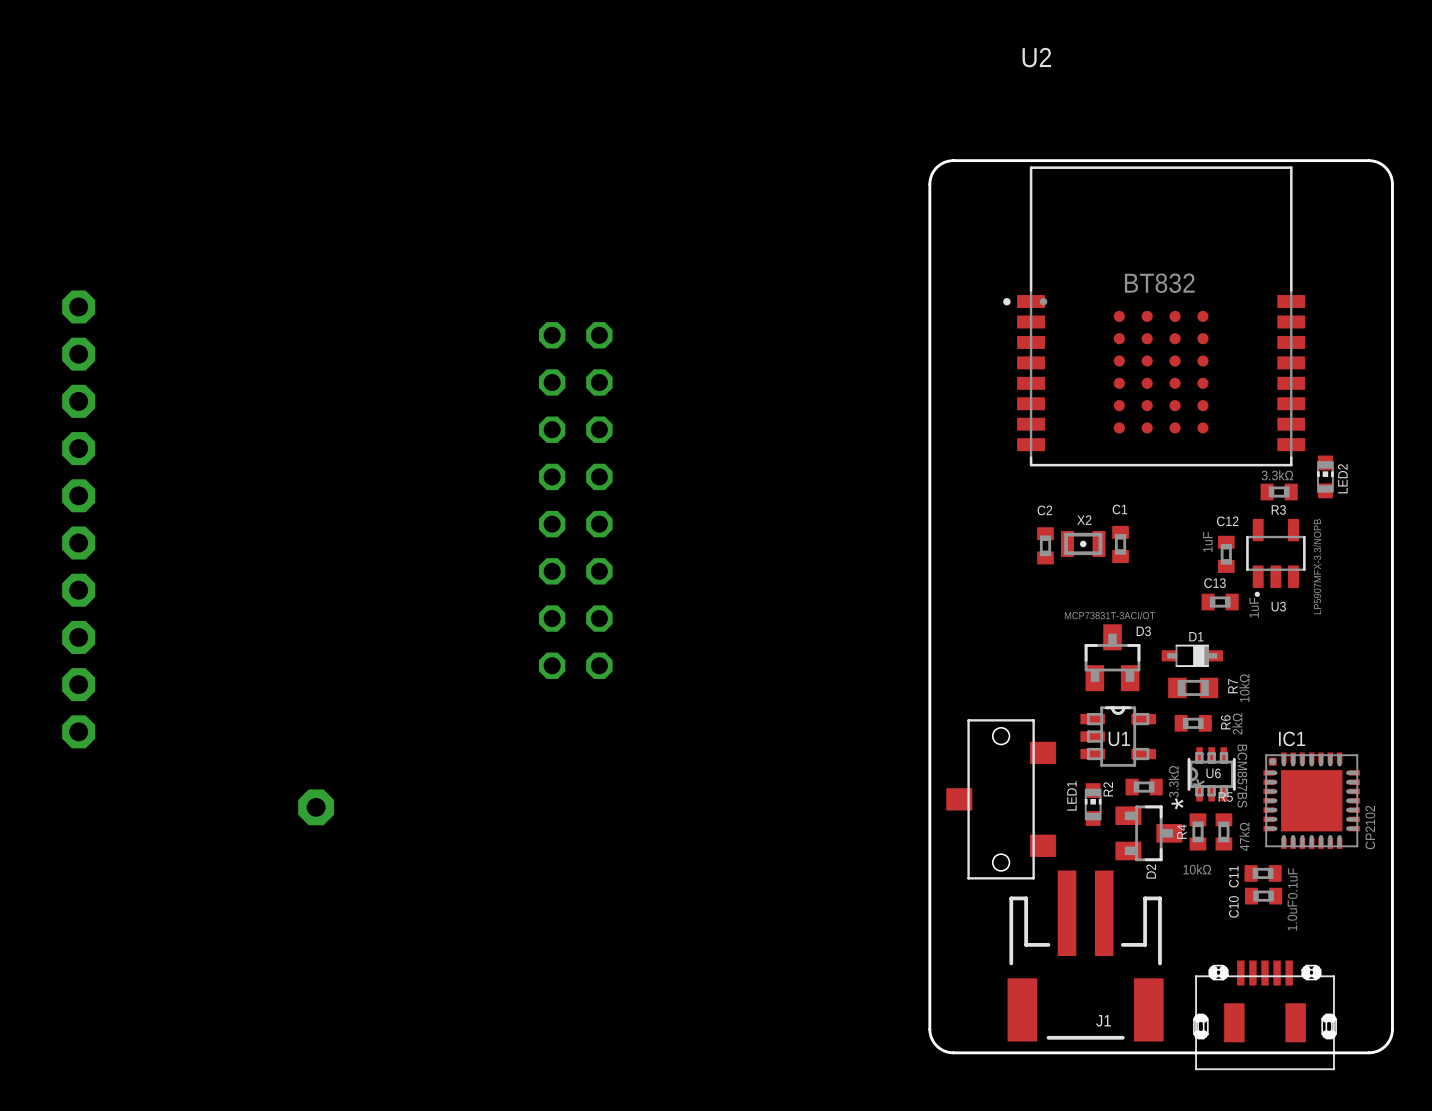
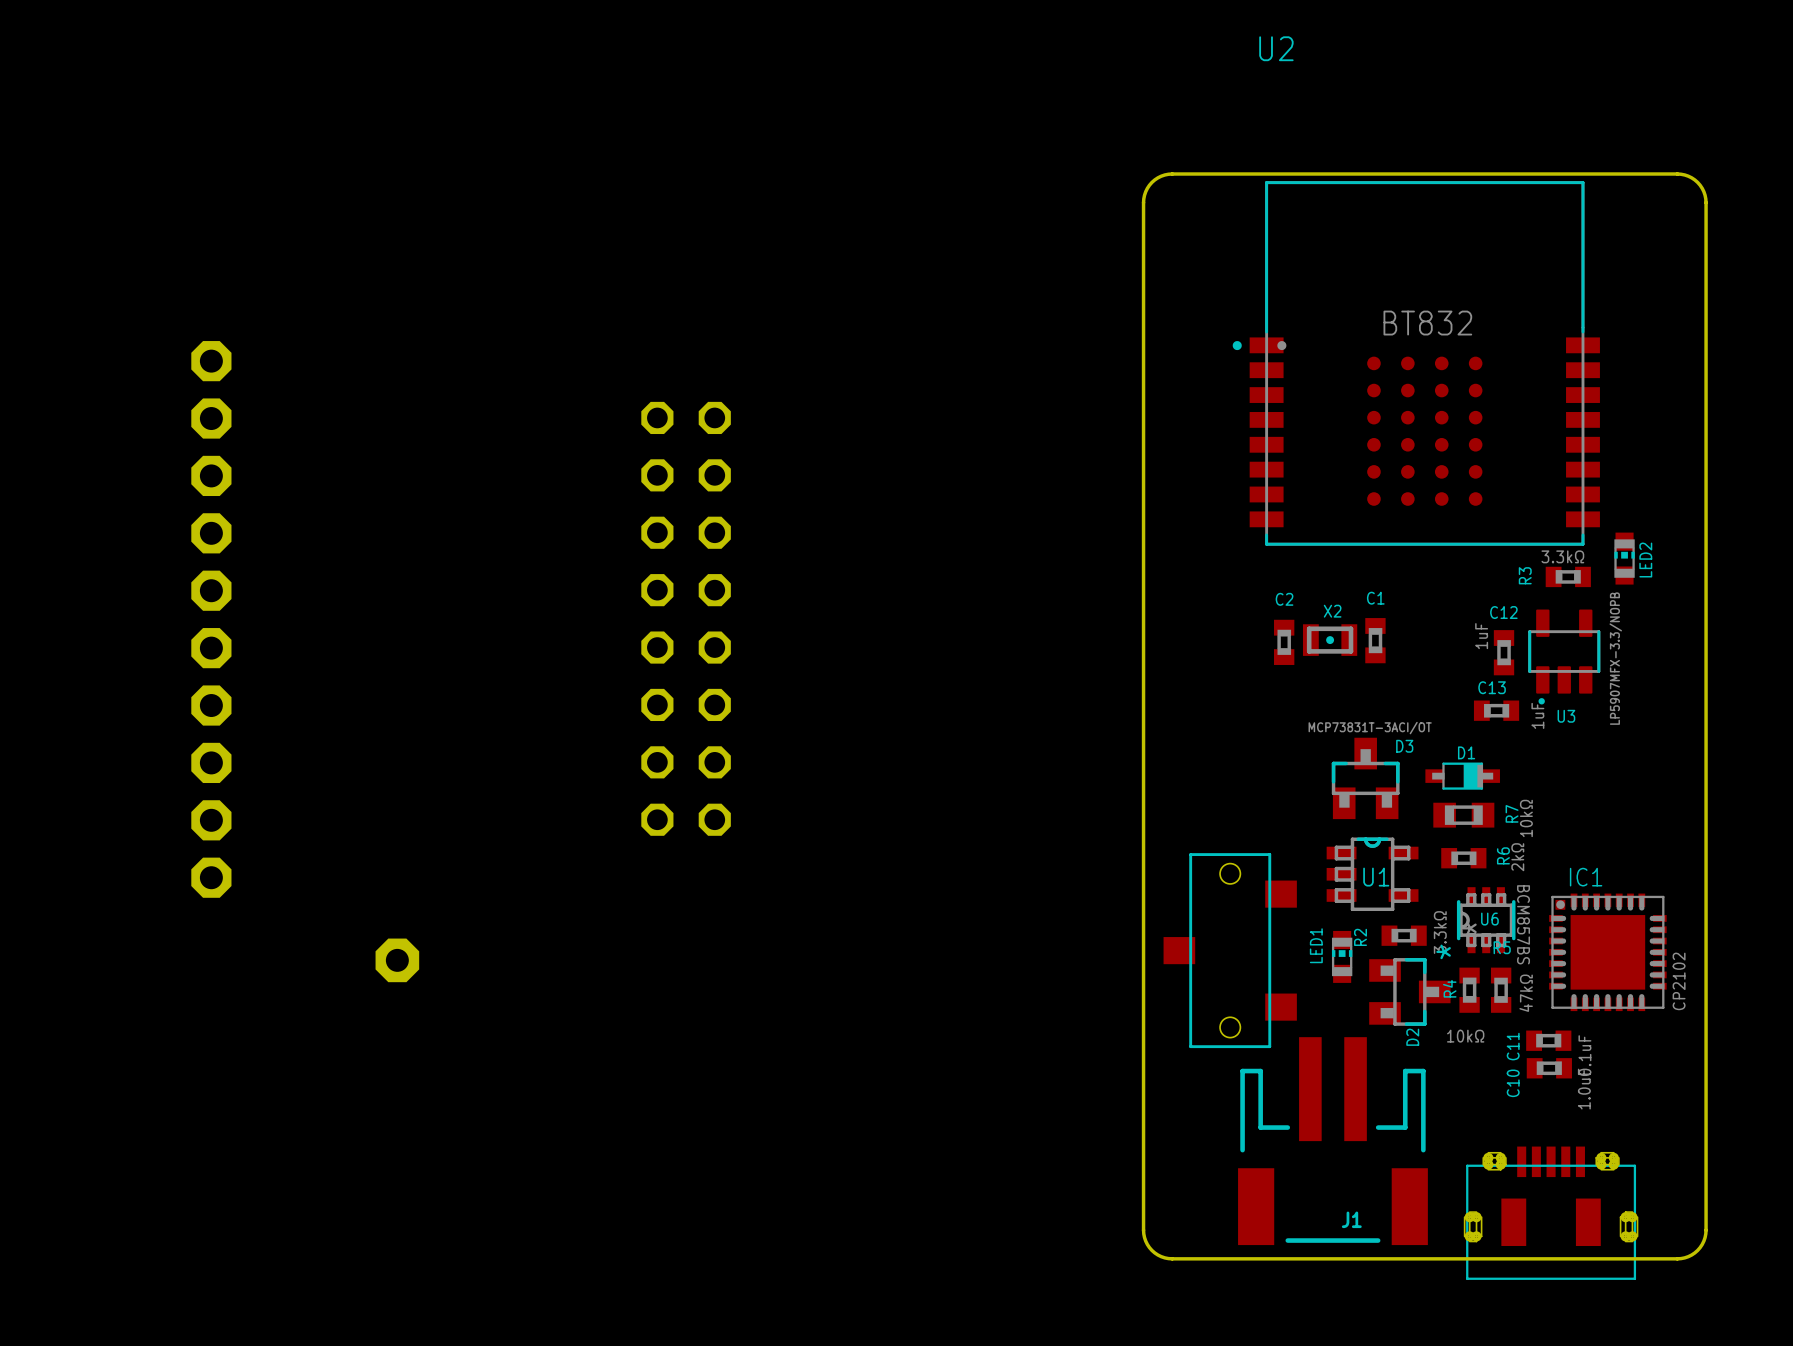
part position: (575, 500) -> (686, 618)
R3 name rotation: 0° (1278, 509) -> 90° counterclockwise (1525, 575)
R3 name position: R3 (1278, 509) -> R3 (1525, 575)
part position: (78, 519) -> (211, 619)

